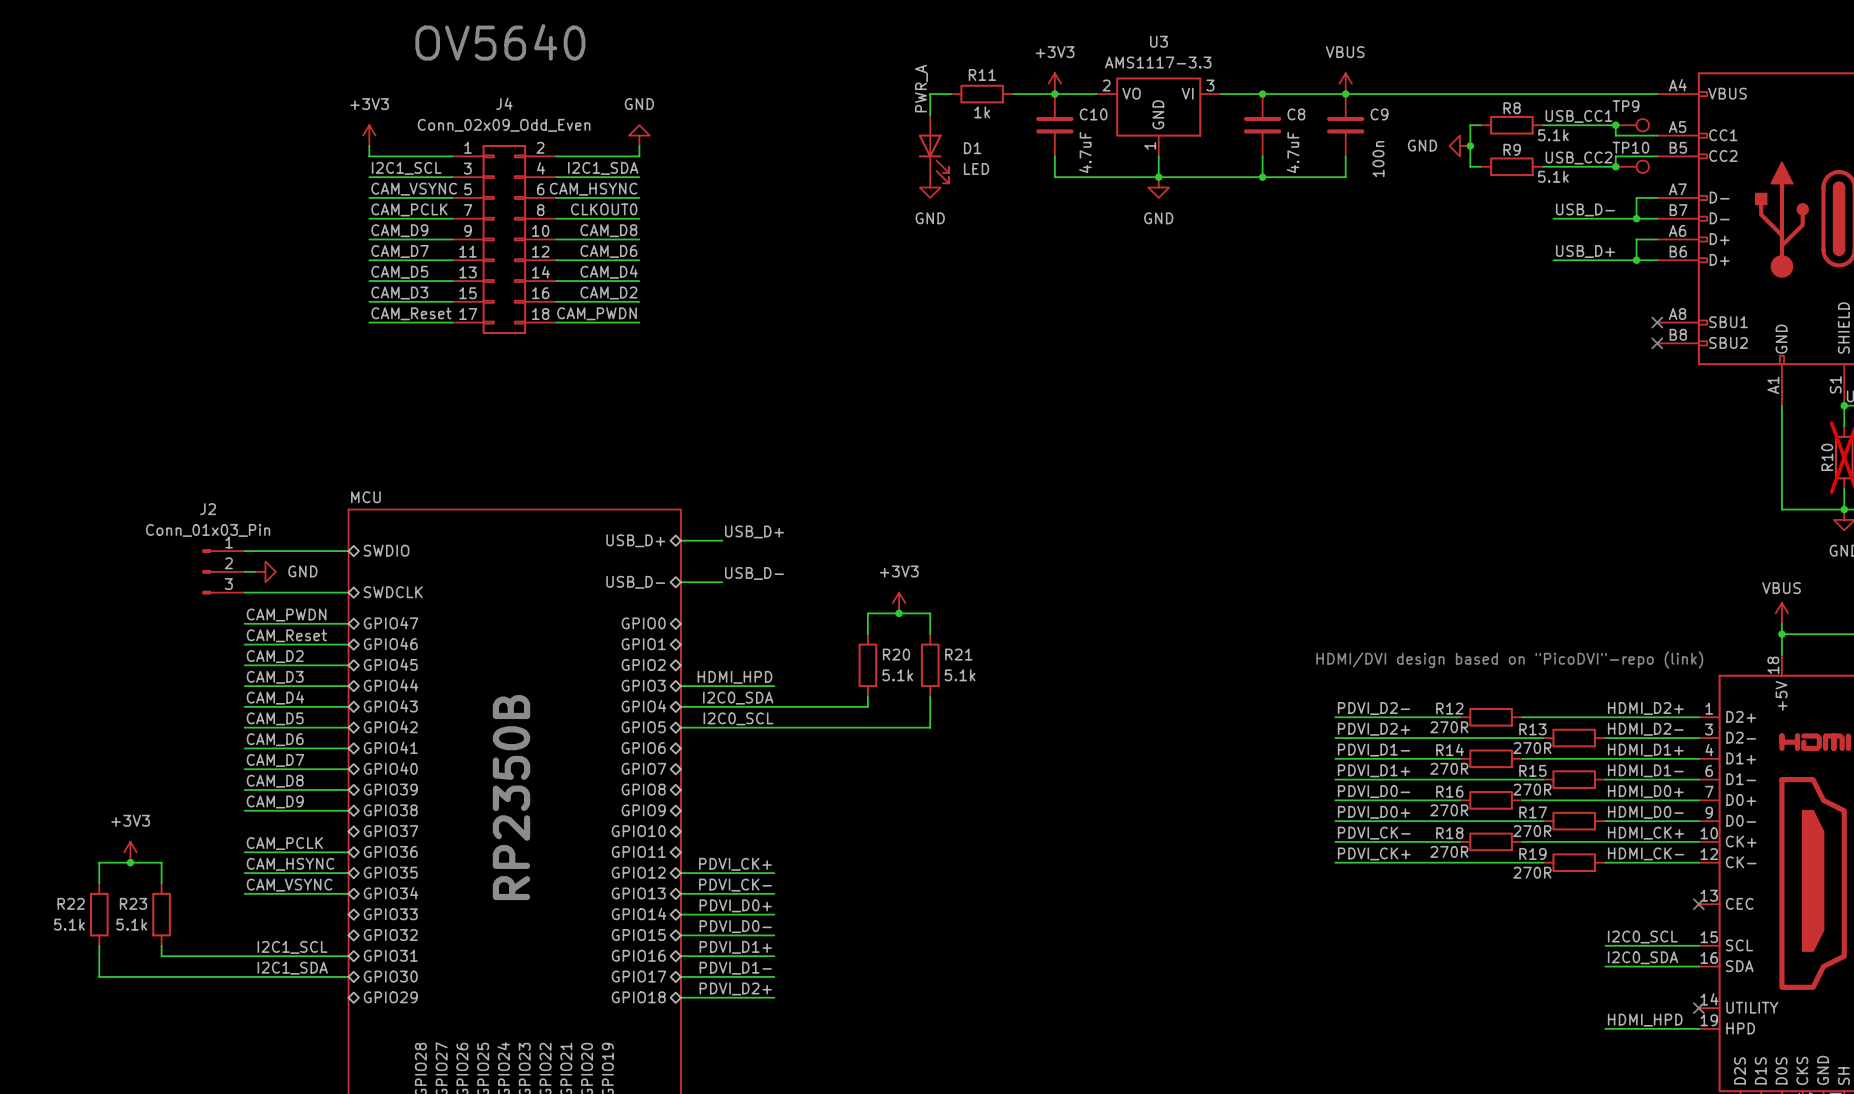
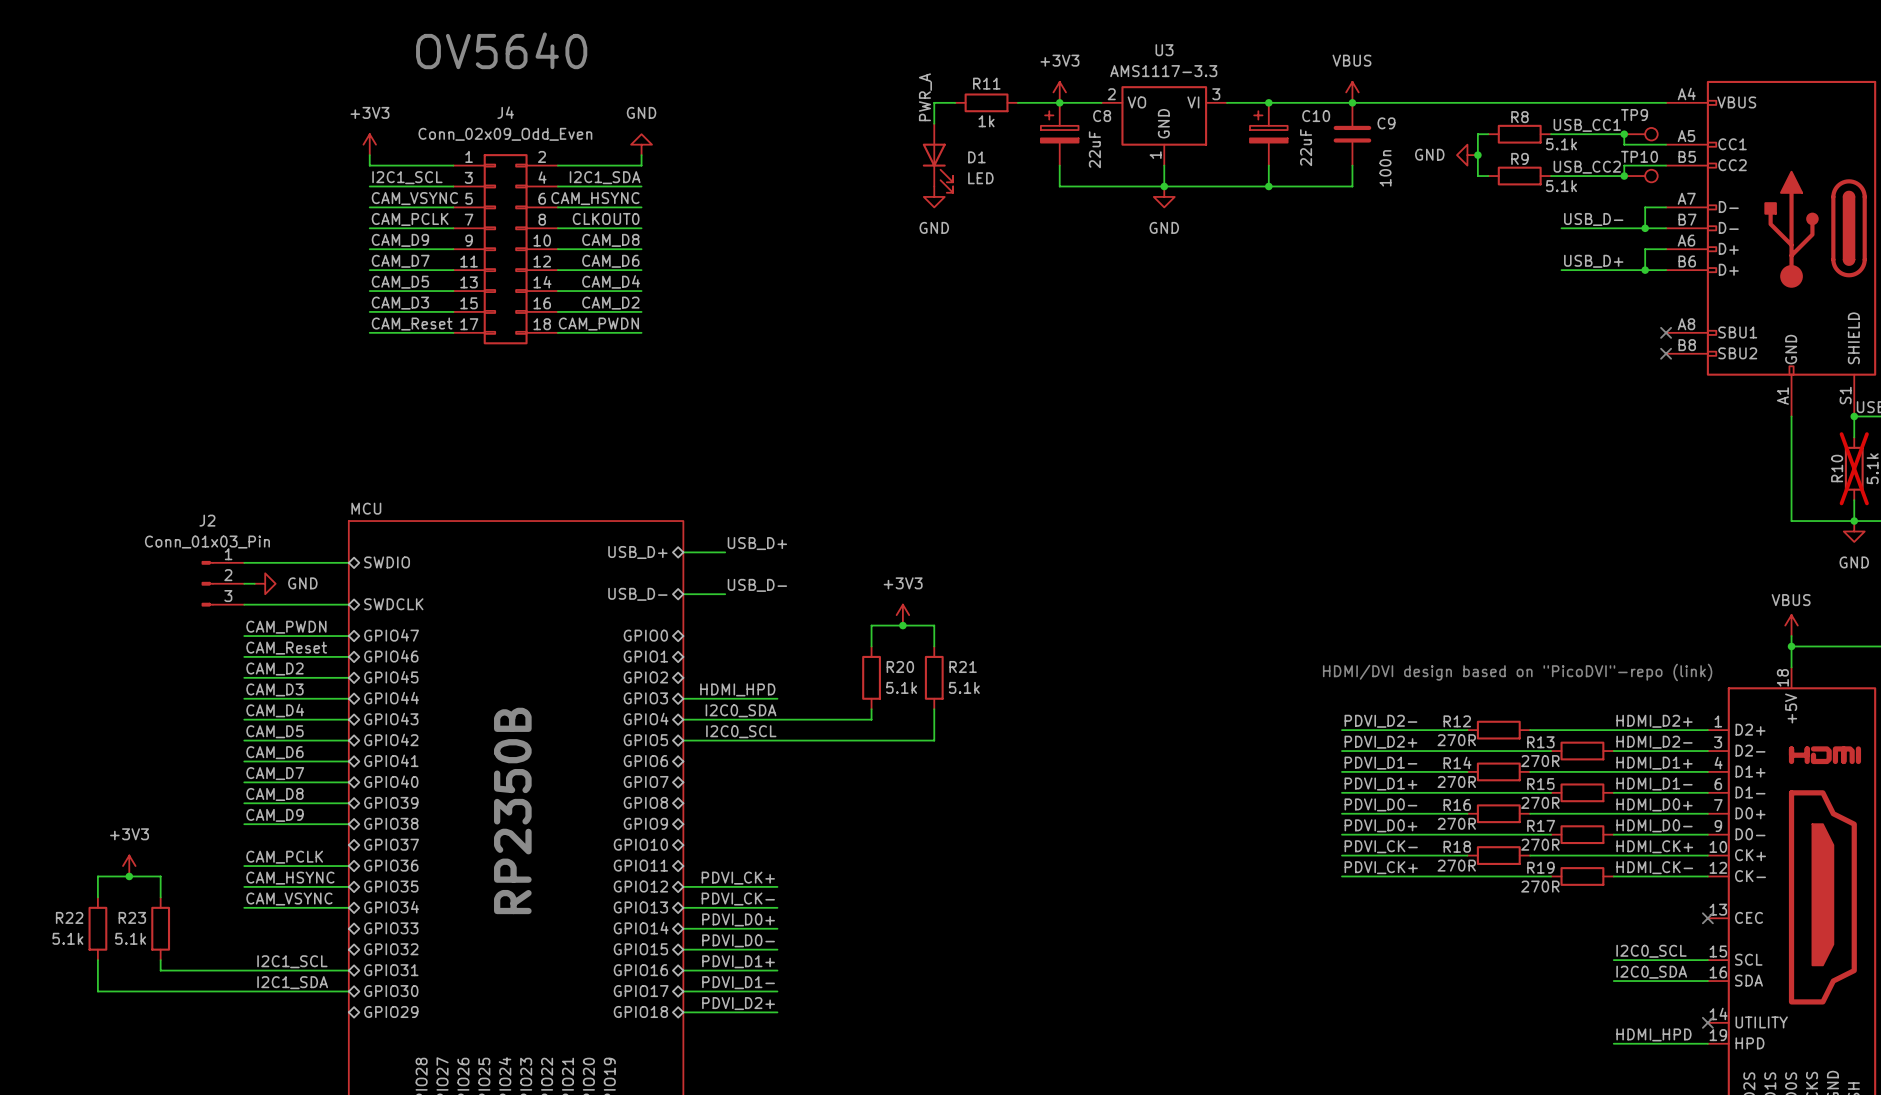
C10 symbol: [1036, 94, 1074, 157] -> [1249, 102, 1288, 166]
C8 symbol: [1243, 94, 1282, 157] -> [1040, 102, 1079, 166]
C10 value: 4.7uF (1085, 152) -> 22uF (1306, 147)
C8 value: 4.7uF (1293, 152) -> 22uF (1094, 149)

